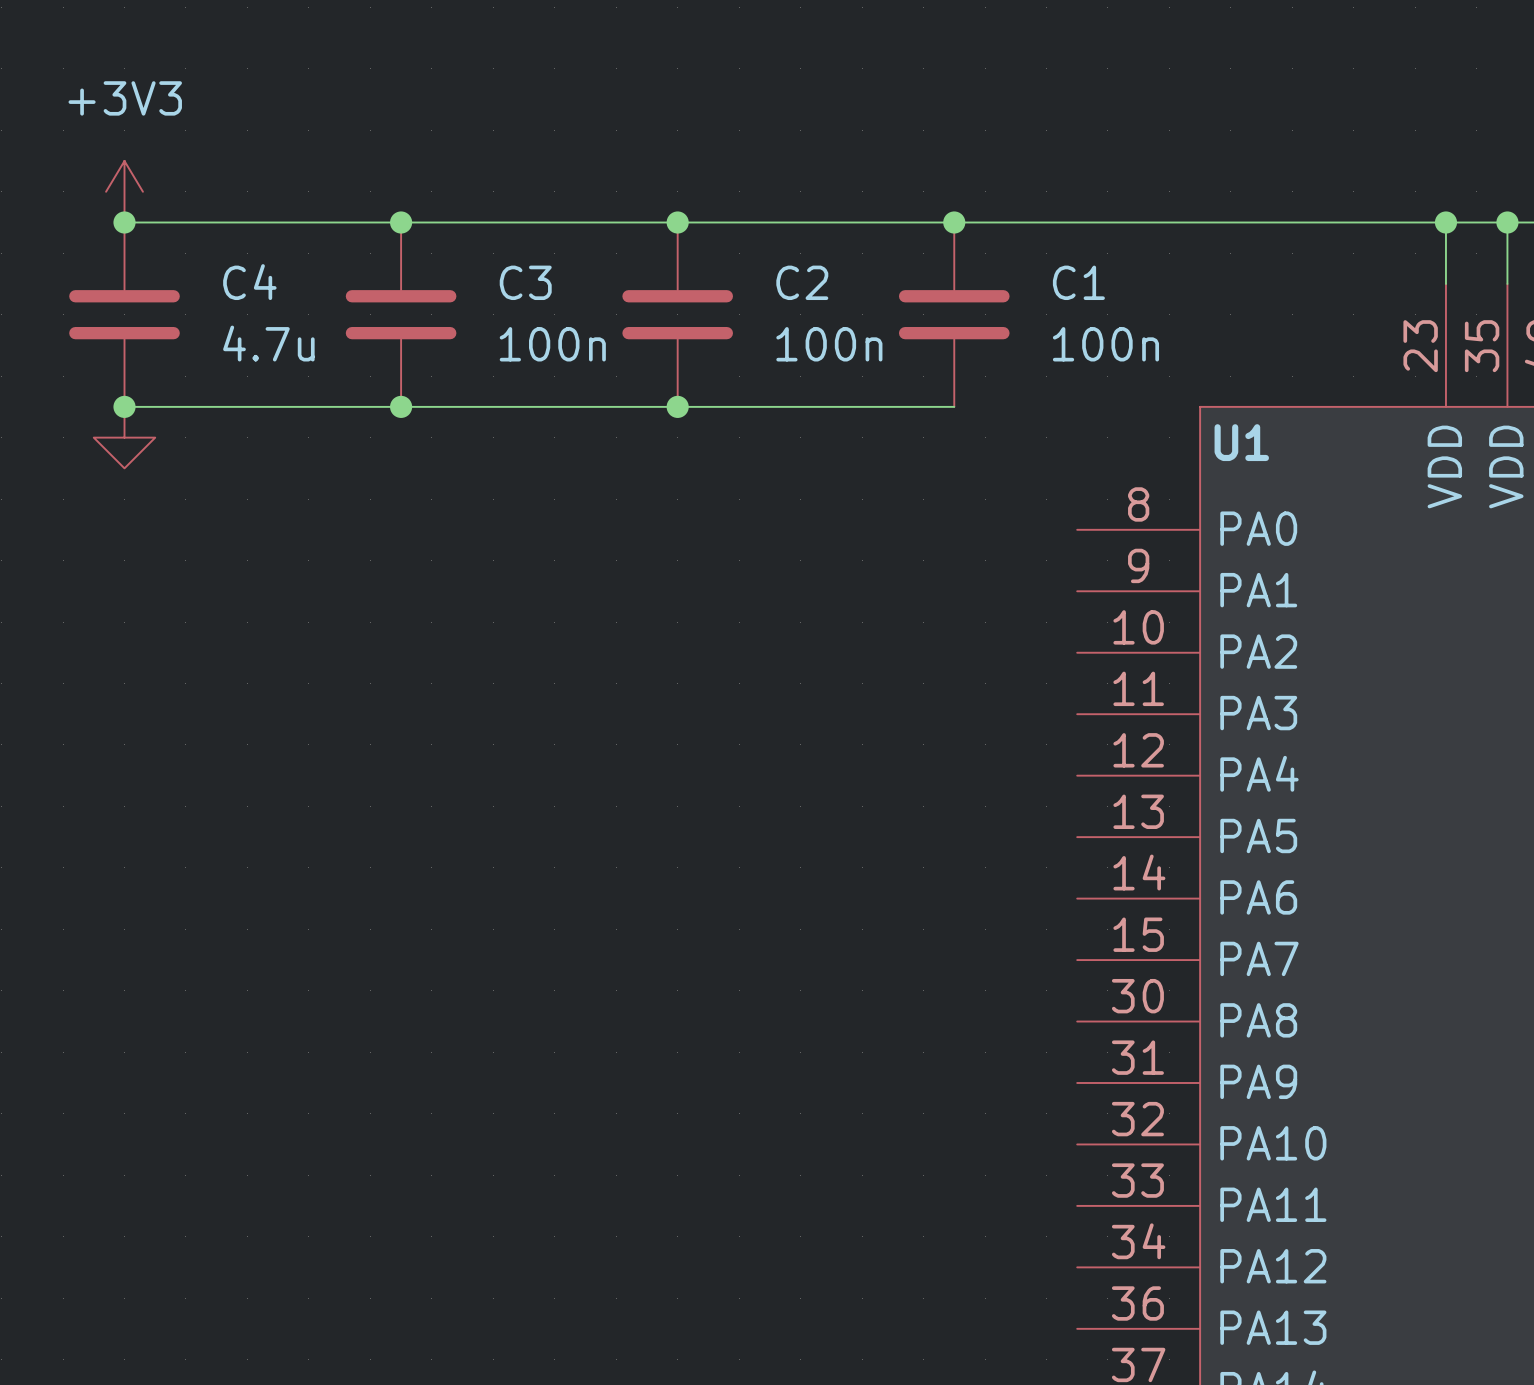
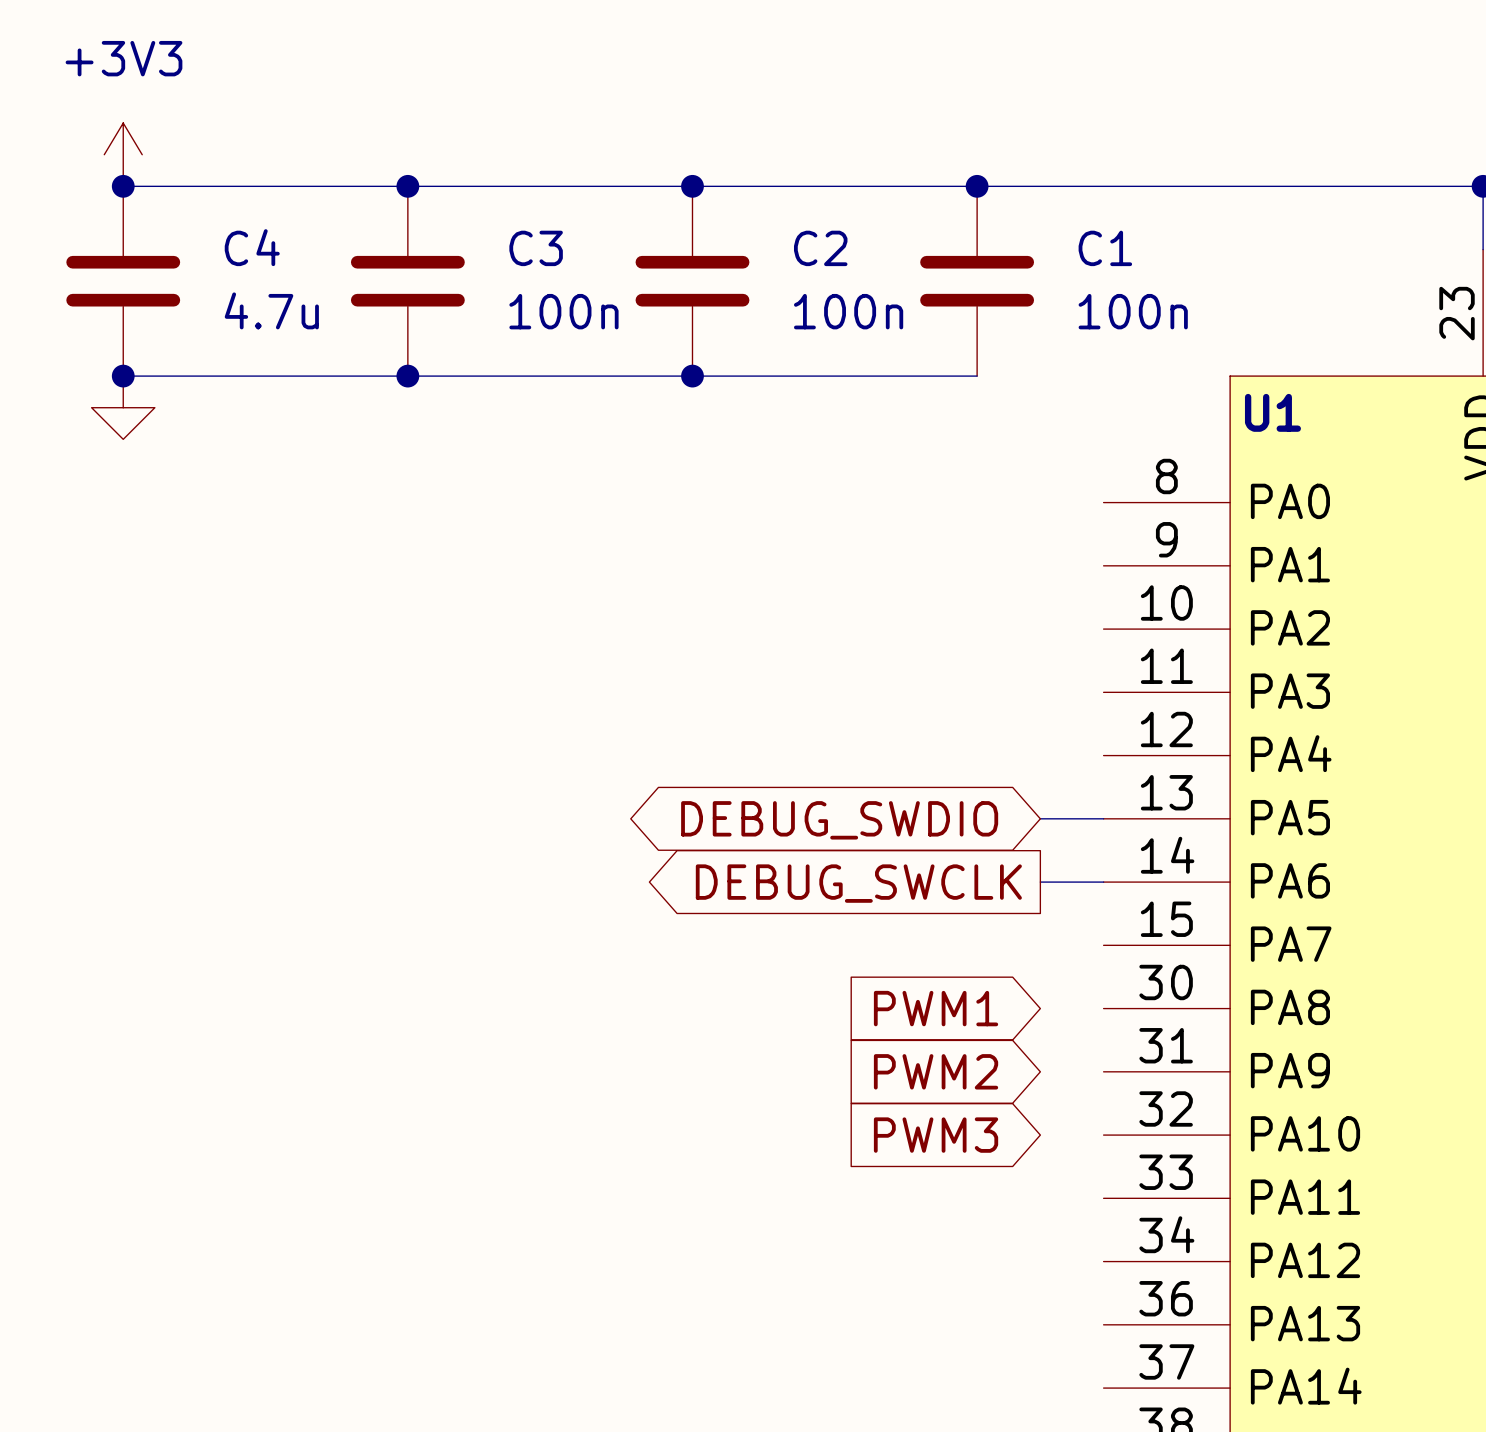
wire: none -> (1040, 818) (1103, 818)
global label: none -> DEBUG_SWDIO (839, 820)
wire: none -> (1040, 882) (1103, 882)
global label: none -> DEBUG_SWCLK (858, 883)
global label: none -> PWM1 (936, 1008)
global label: none -> PWM2 (936, 1071)
global label: none -> PWM3 (936, 1135)

